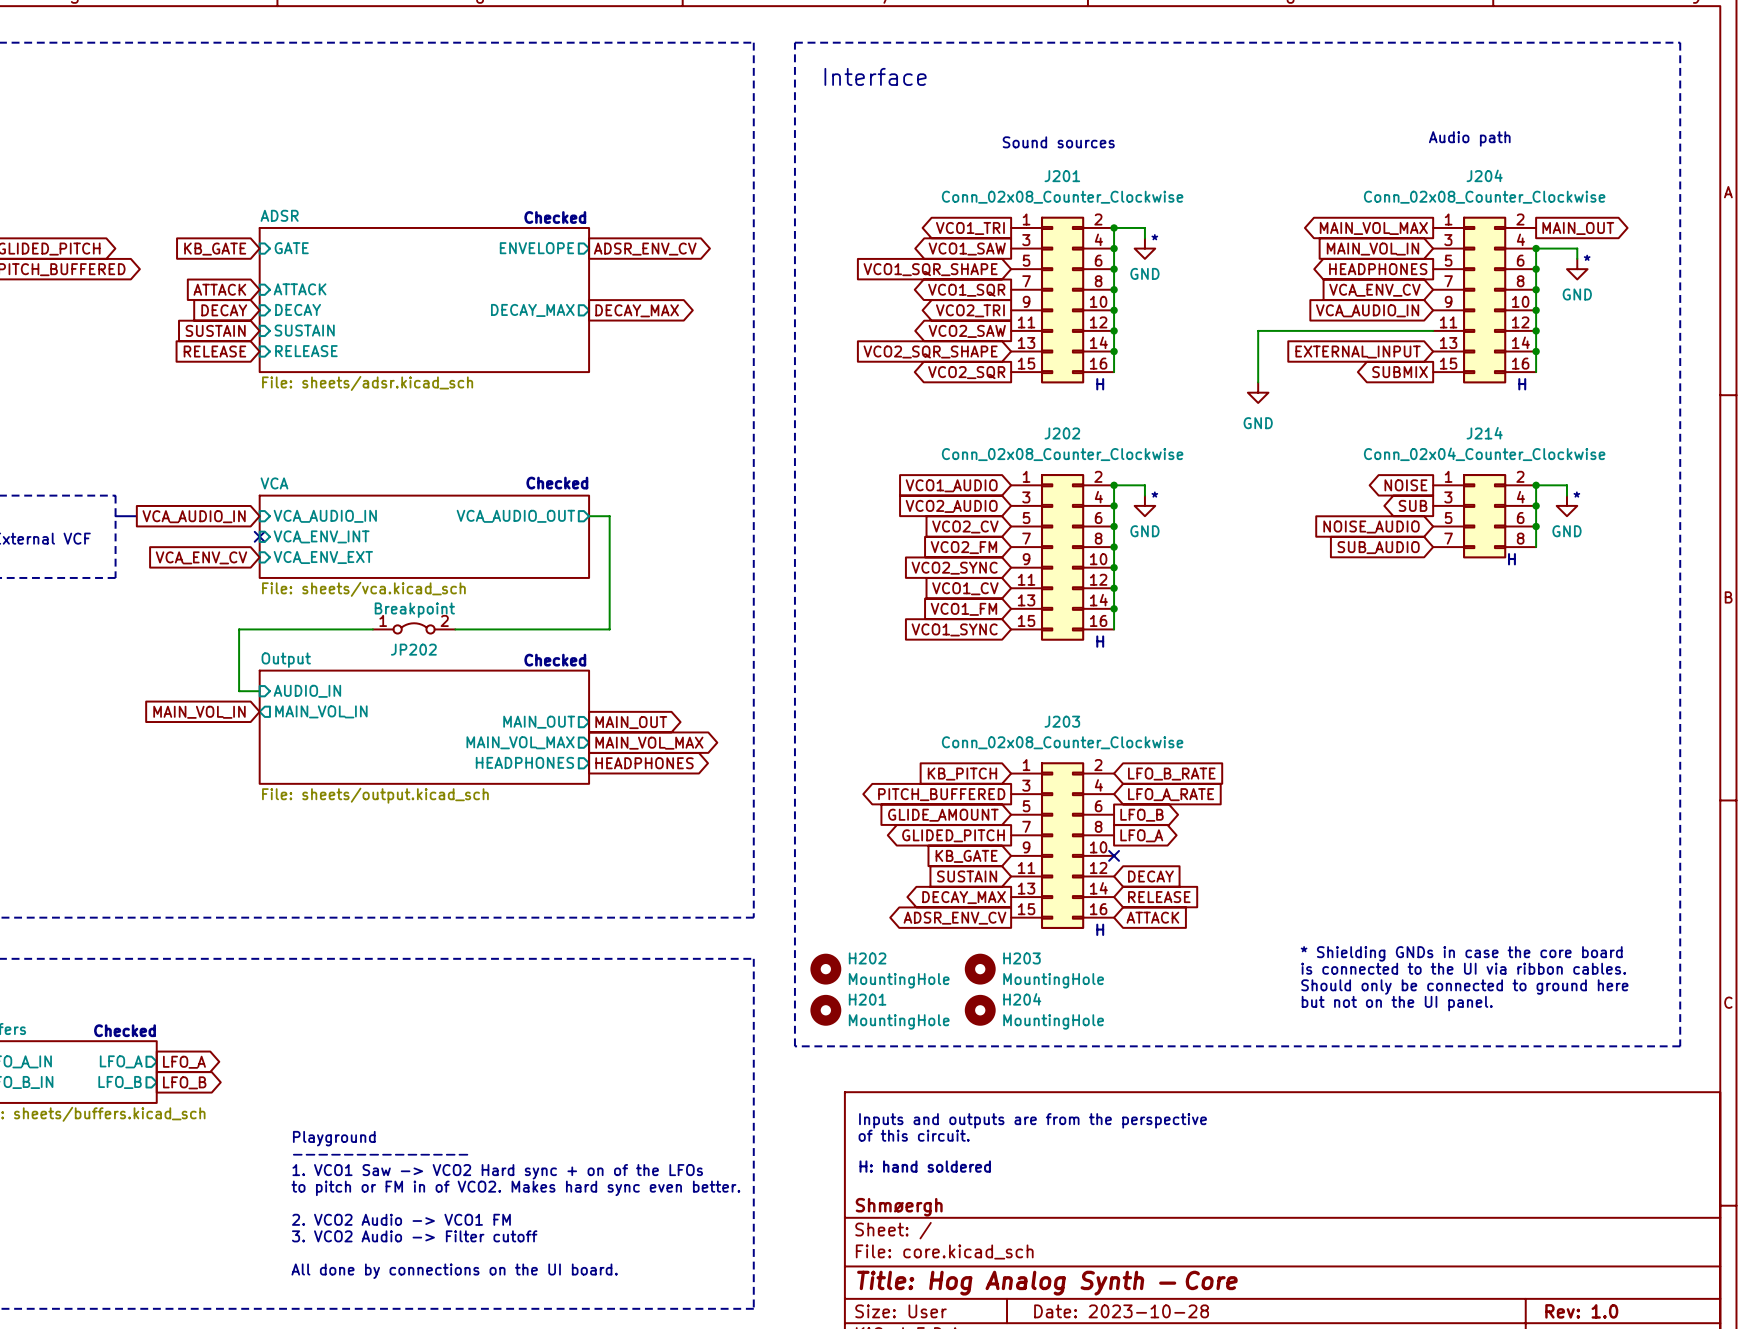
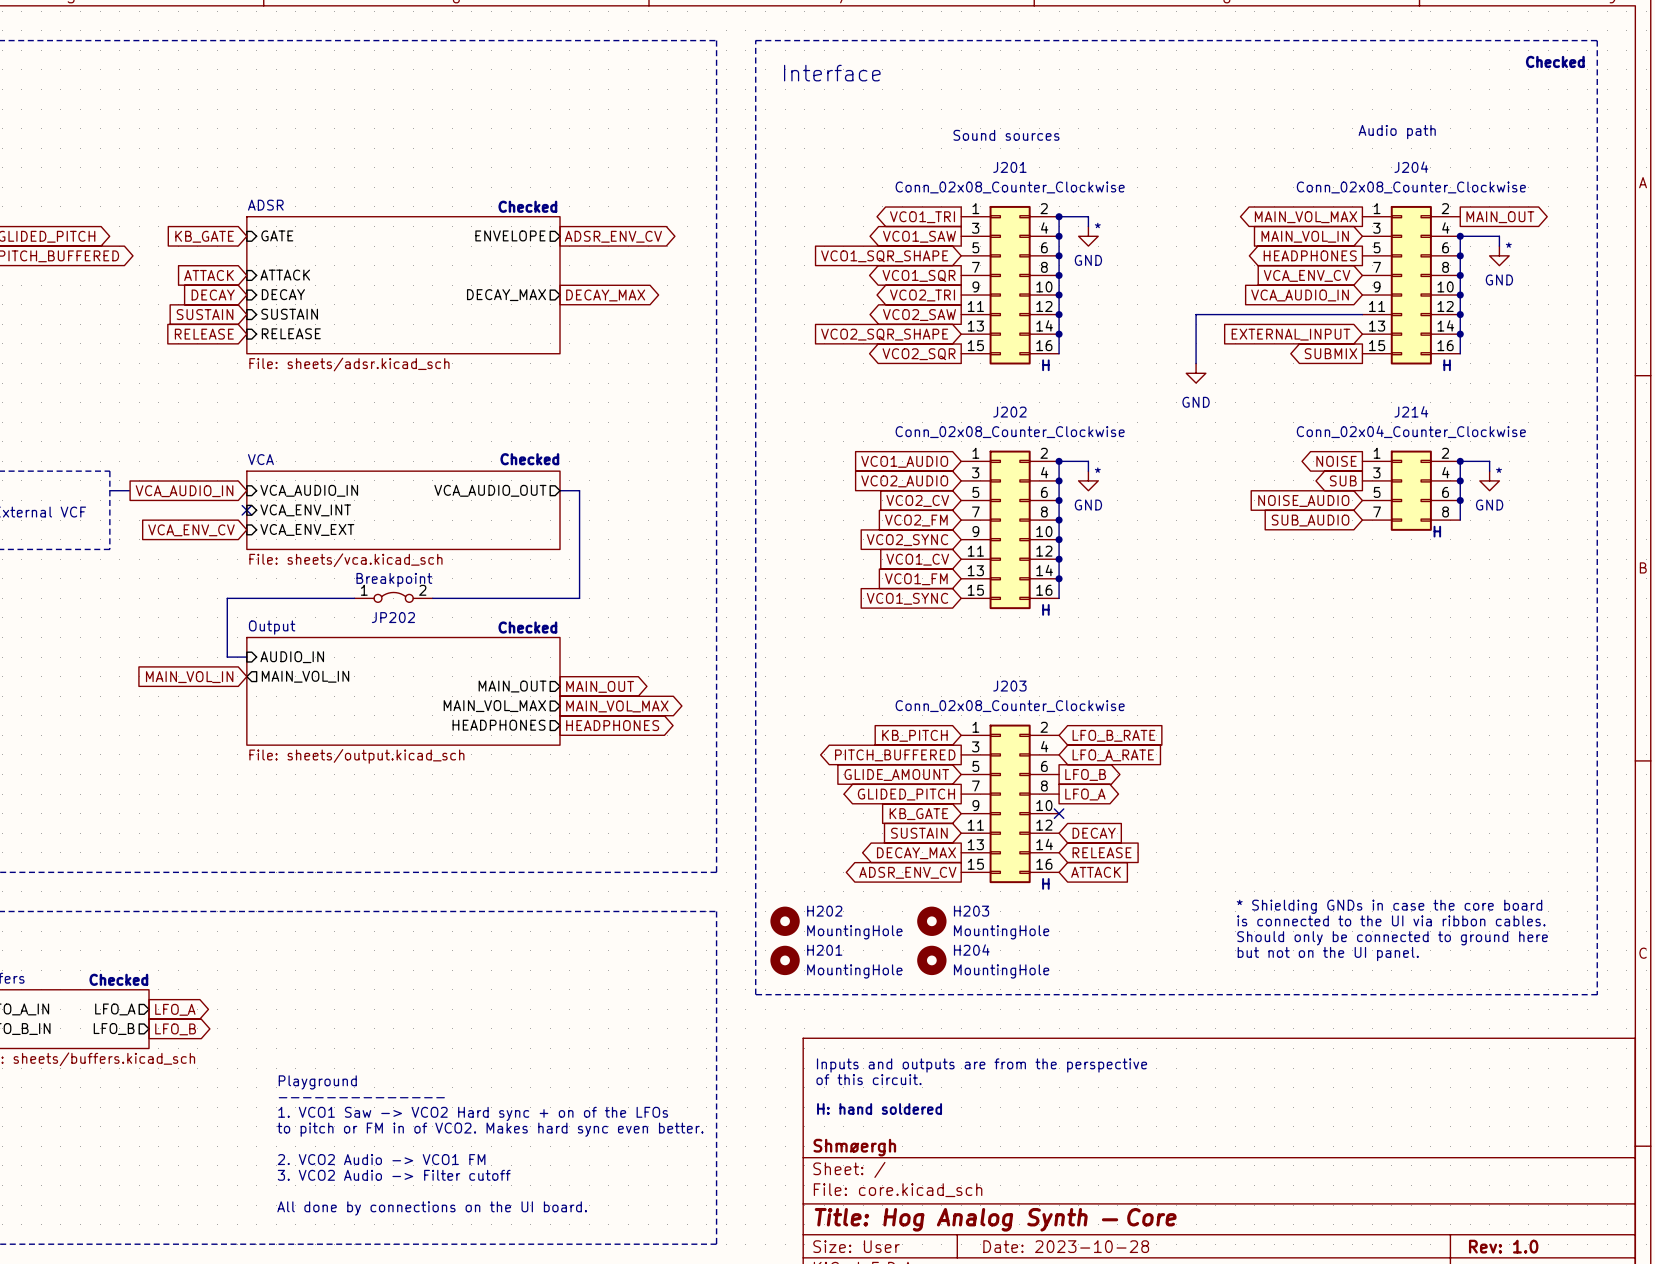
text: none -> Checked (1555, 61)

